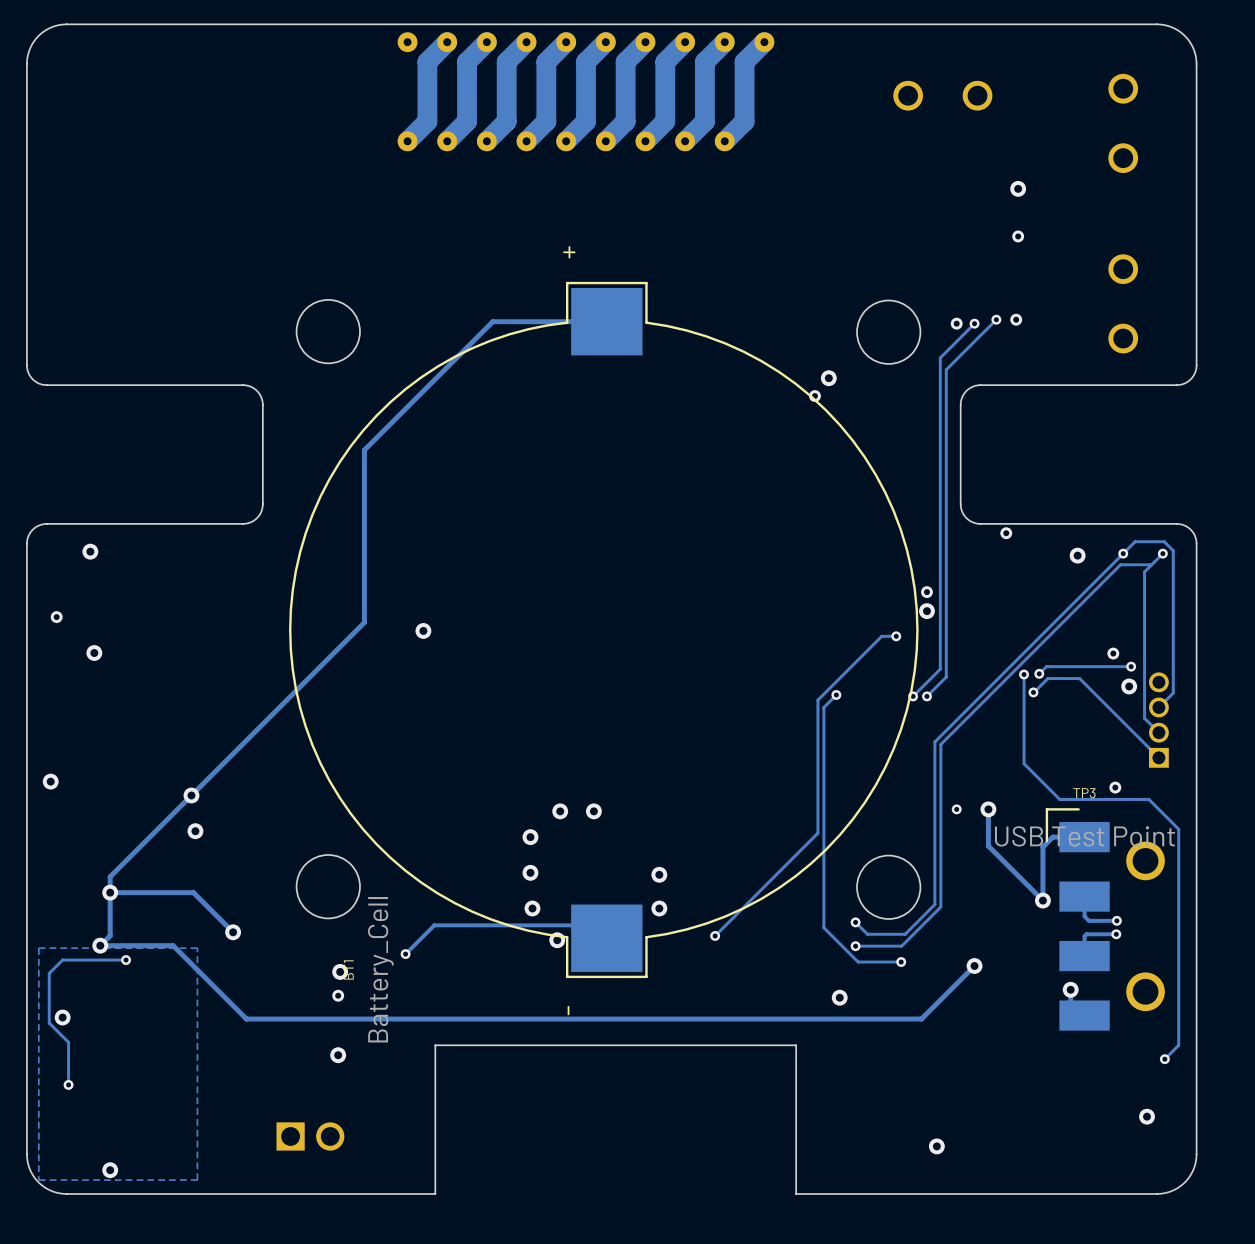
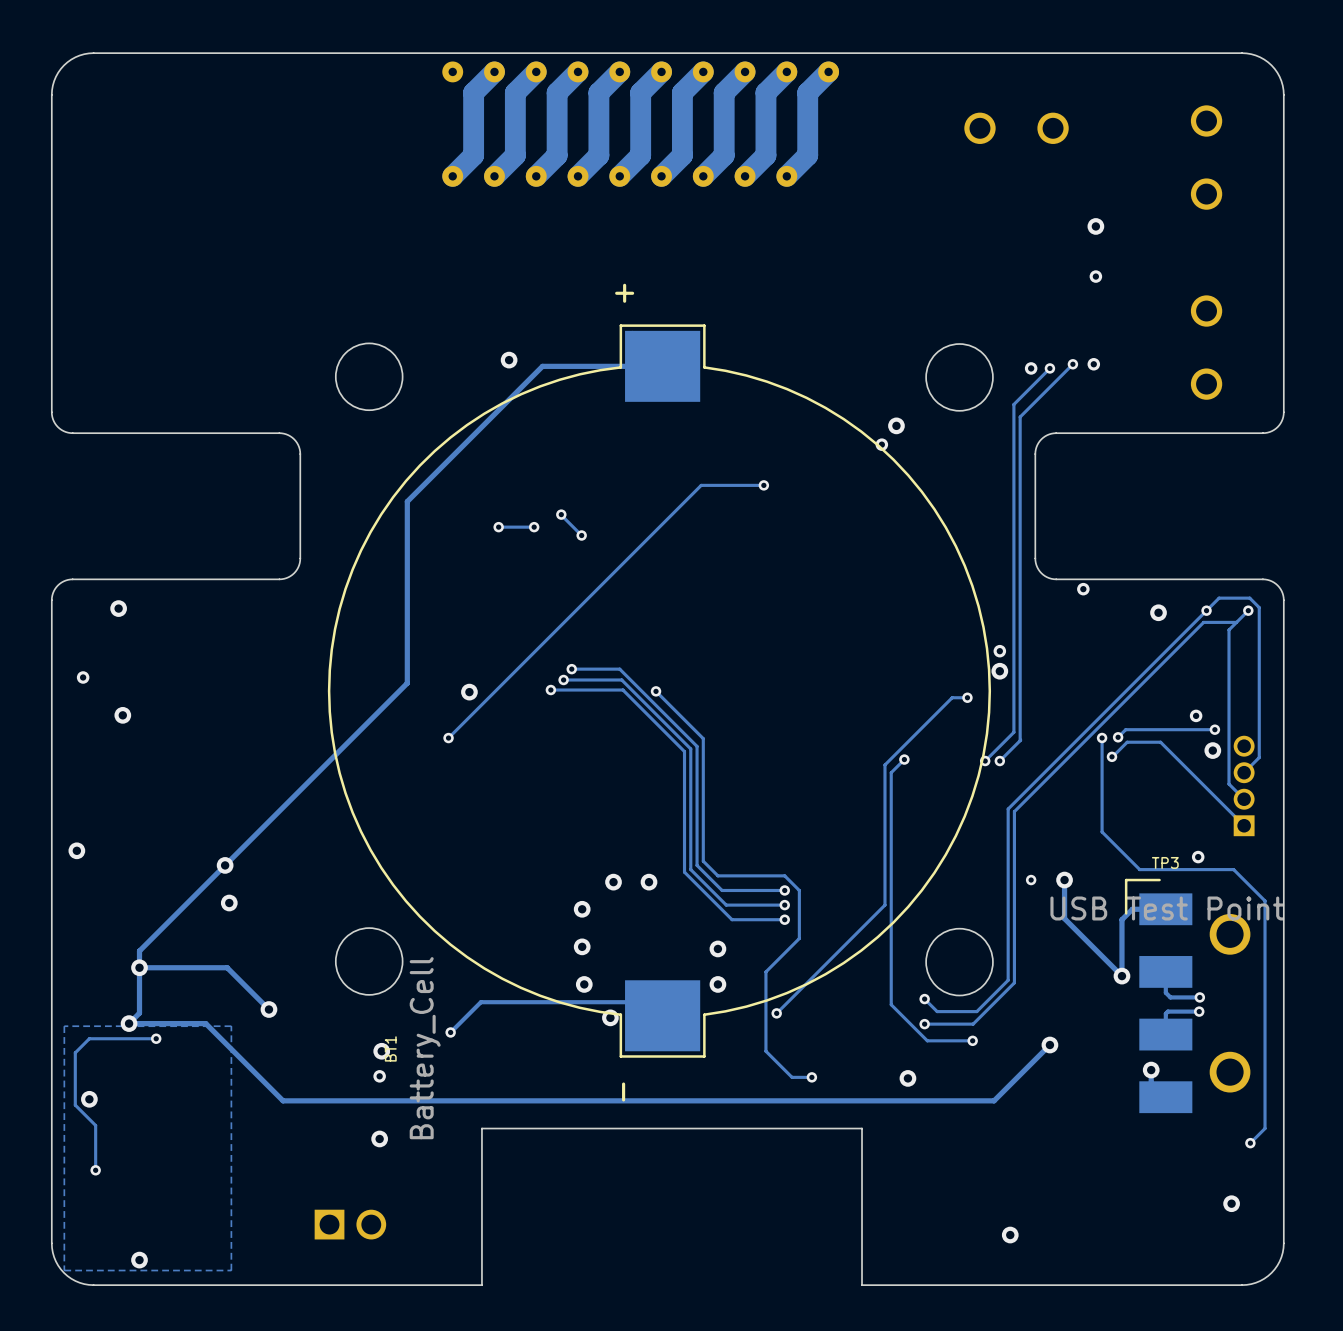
via: none -> (509, 360)
track: none -> (763, 485) (701, 485) (448, 738)
via: none -> (763, 485)
track: none -> (561, 514) (581, 535)
via: none -> (561, 514)
via: none -> (498, 527)
track: none -> (534, 527) (498, 527)
via: none -> (534, 527)
via: none -> (581, 535)
track: none -> (571, 669) (619, 669) (697, 746) (697, 865) (722, 890) (784, 890)
via: none -> (571, 669)
track: none -> (563, 679) (621, 679) (690, 748) (690, 869) (726, 905) (784, 905)
via: none -> (563, 679)
track: none -> (550, 690) (622, 690) (684, 751) (684, 872) (732, 919) (784, 919)
via: none -> (550, 690)
track: none -> (656, 691) (703, 738) (703, 861) (717, 875) (784, 875) (799, 890) (799, 938) (765, 971) (765, 1051) (792, 1077) (811, 1077)
via: none -> (656, 691)
via: none -> (448, 738)
via: none -> (784, 890)
via: none -> (784, 905)
via: none -> (784, 919)
via: none -> (811, 1077)

